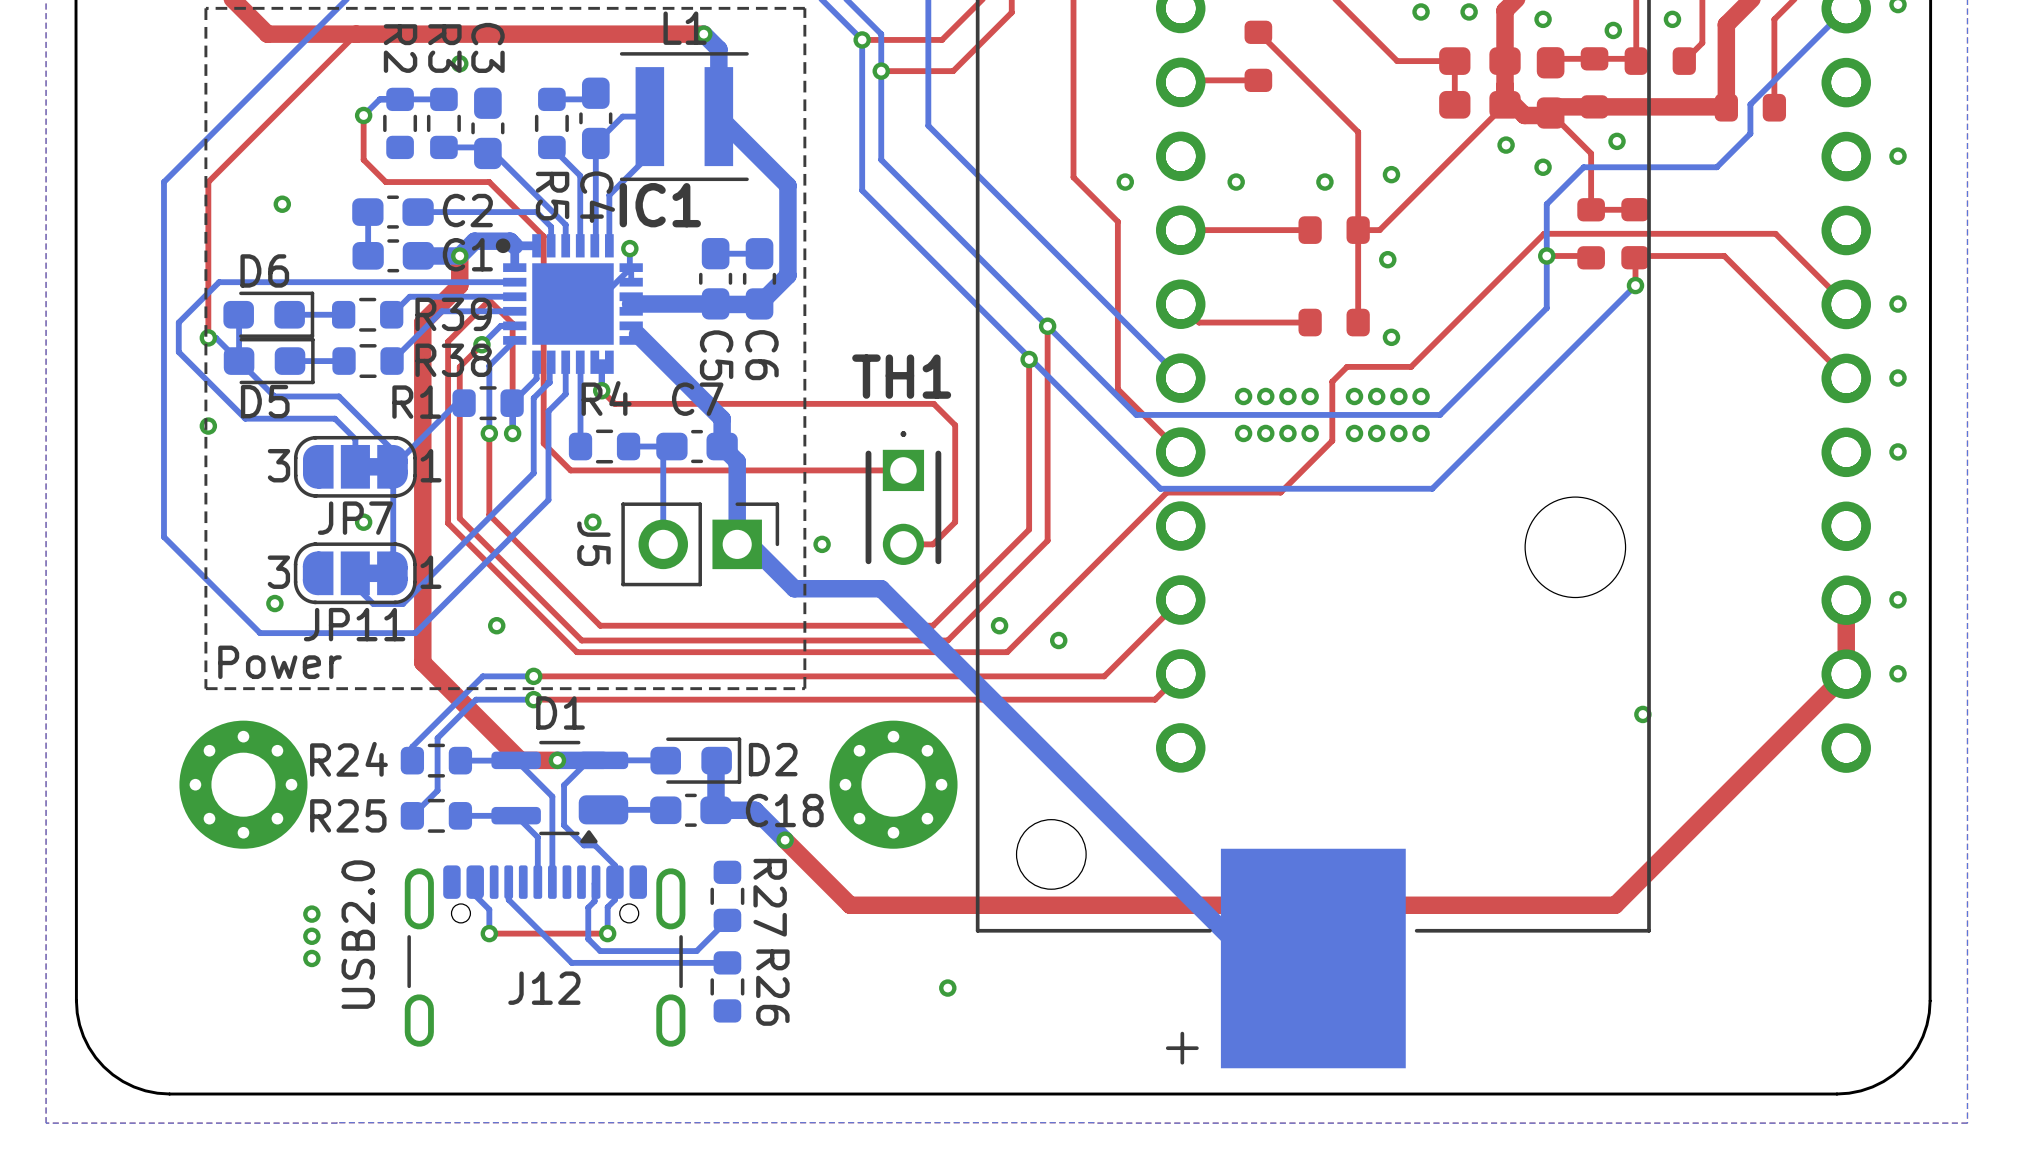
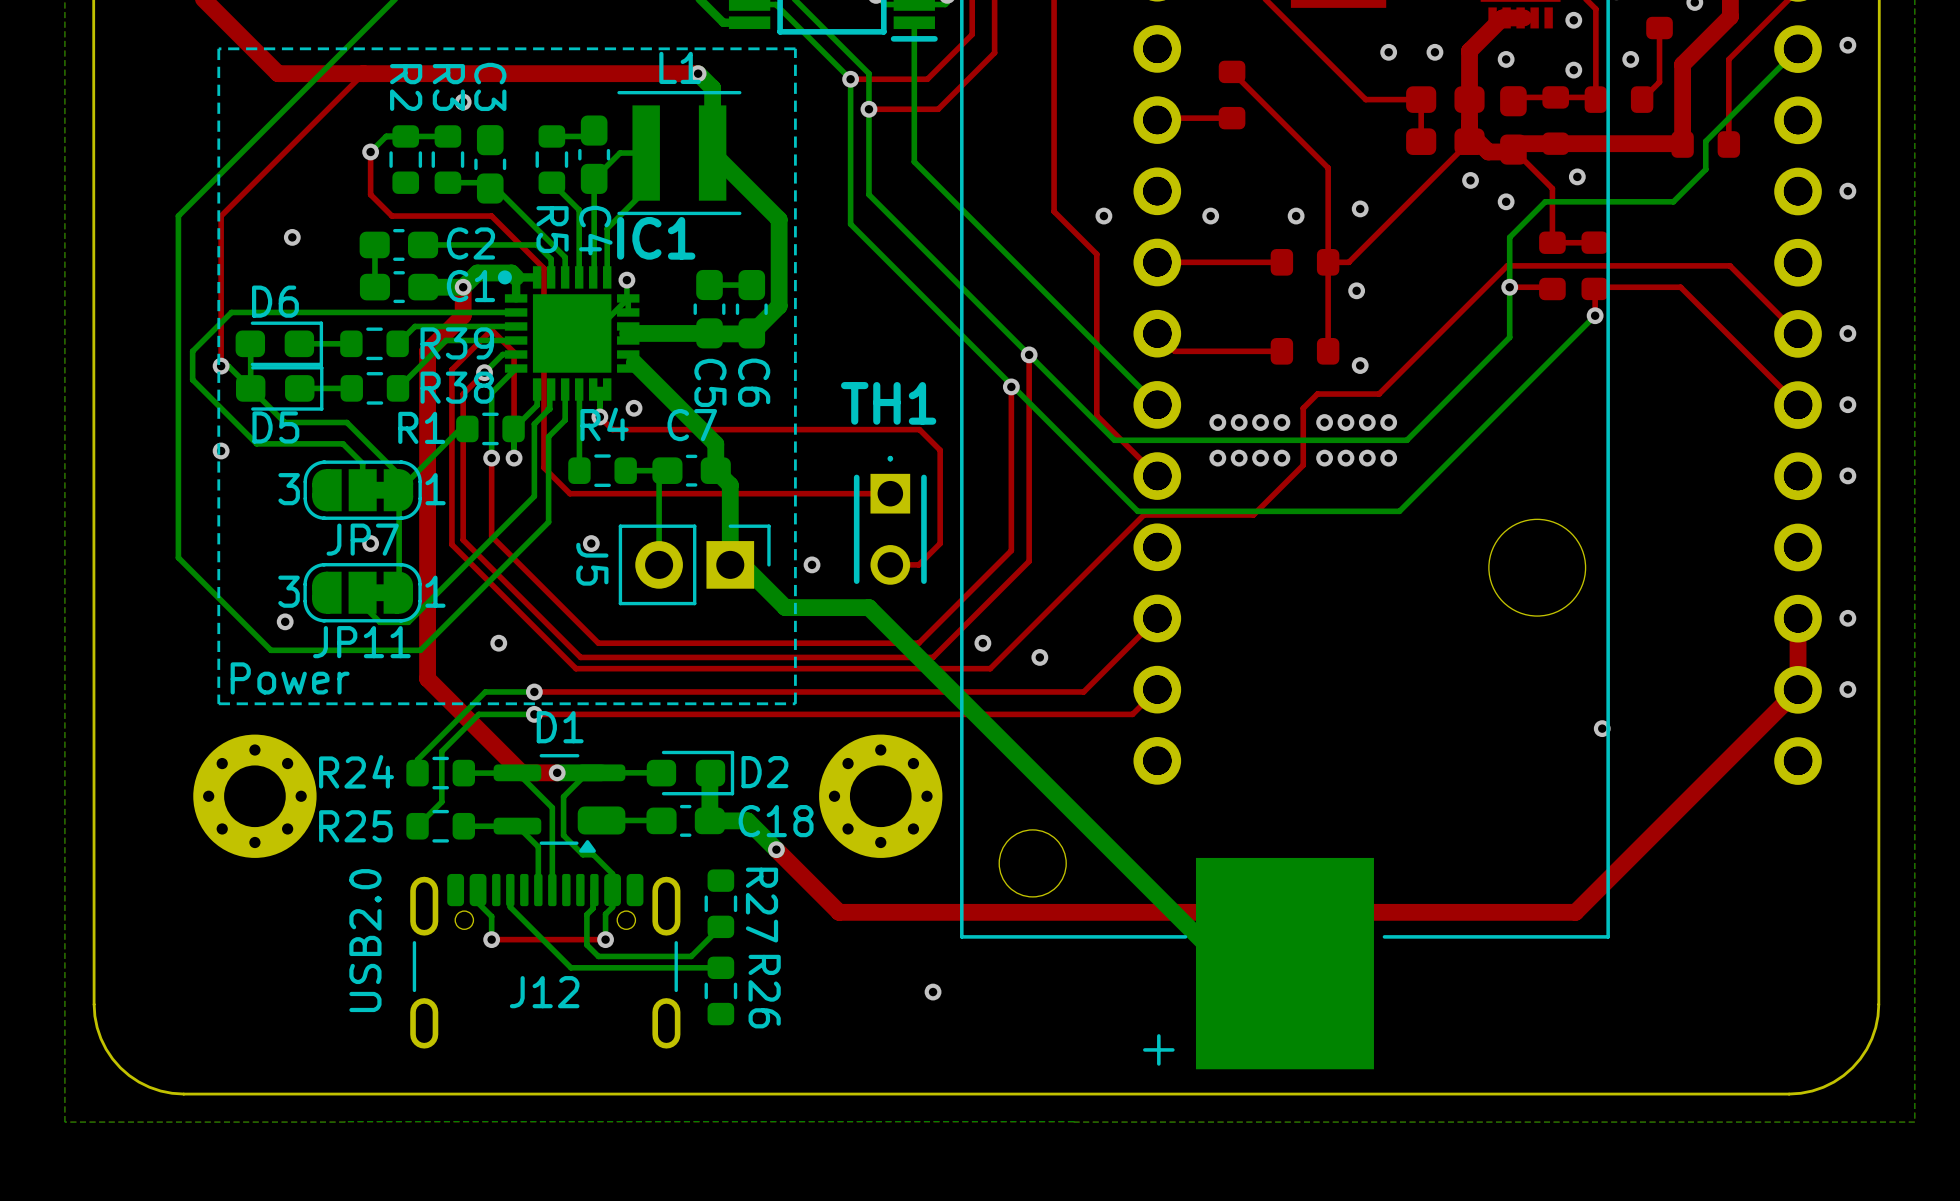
via: none -> (634, 408)
via: (311, 914) -> none
via: (311, 936) -> none
via: (311, 958) -> none

